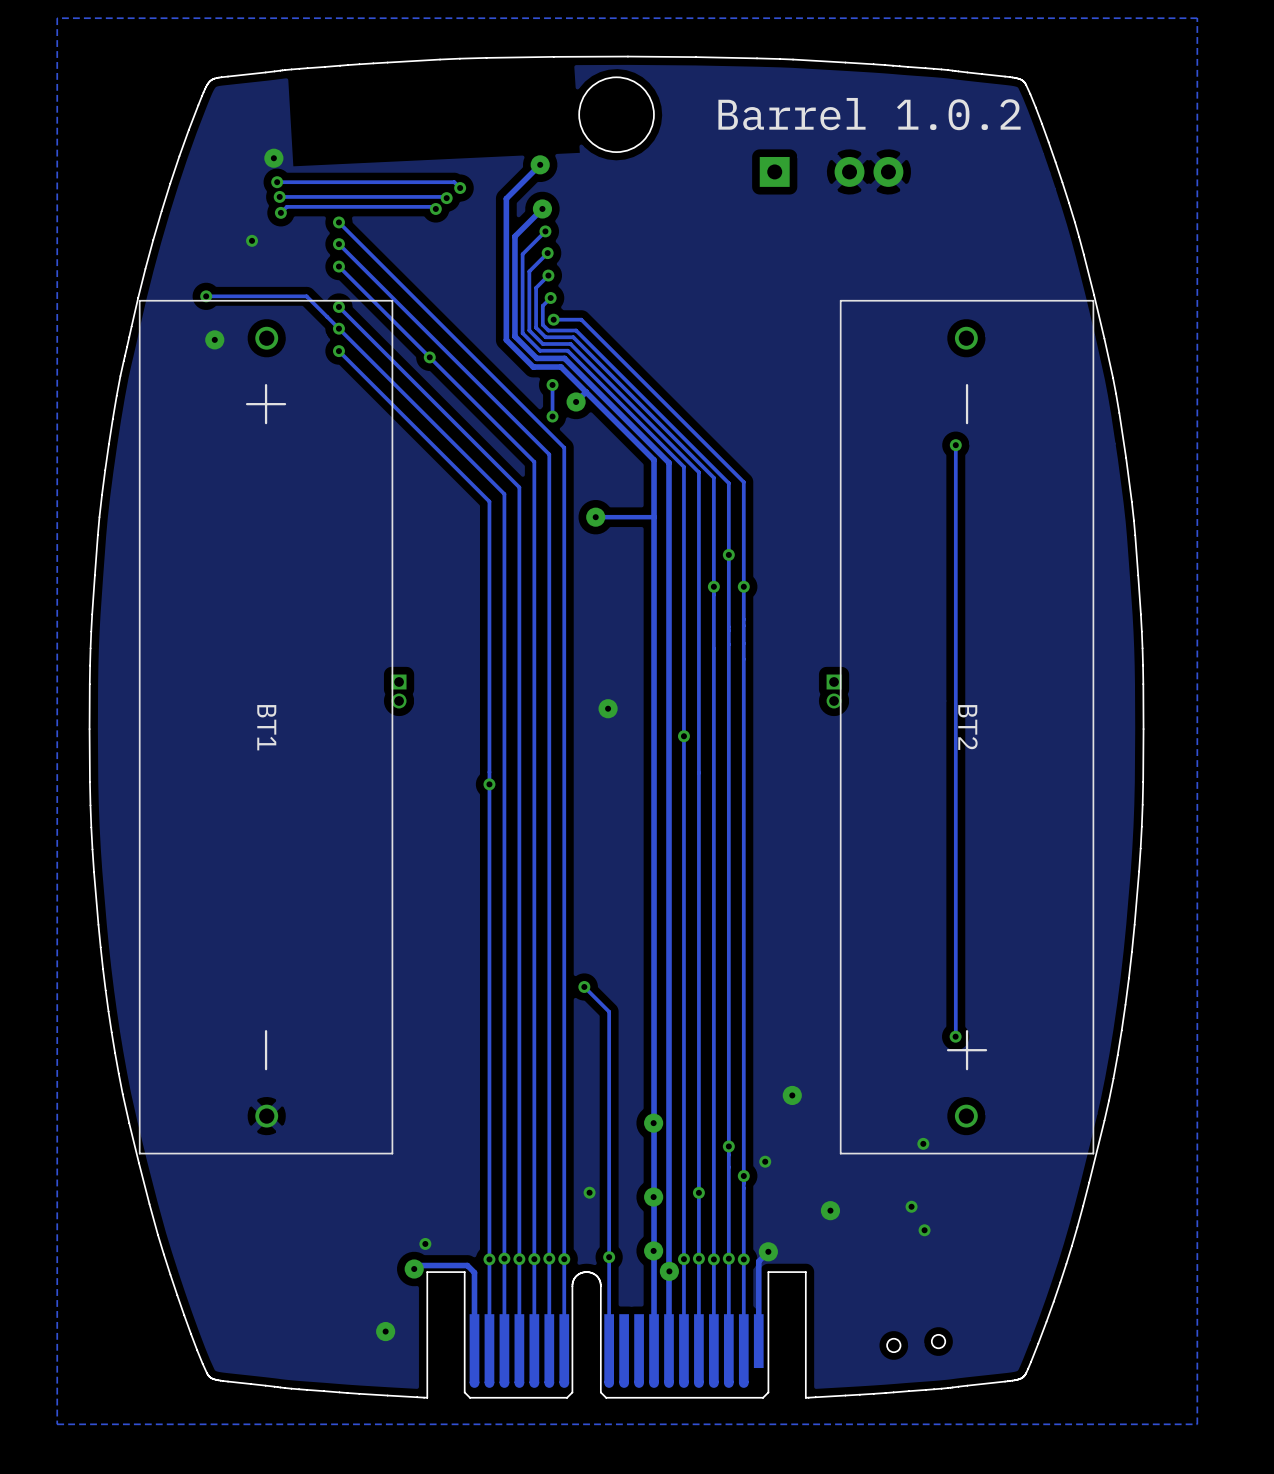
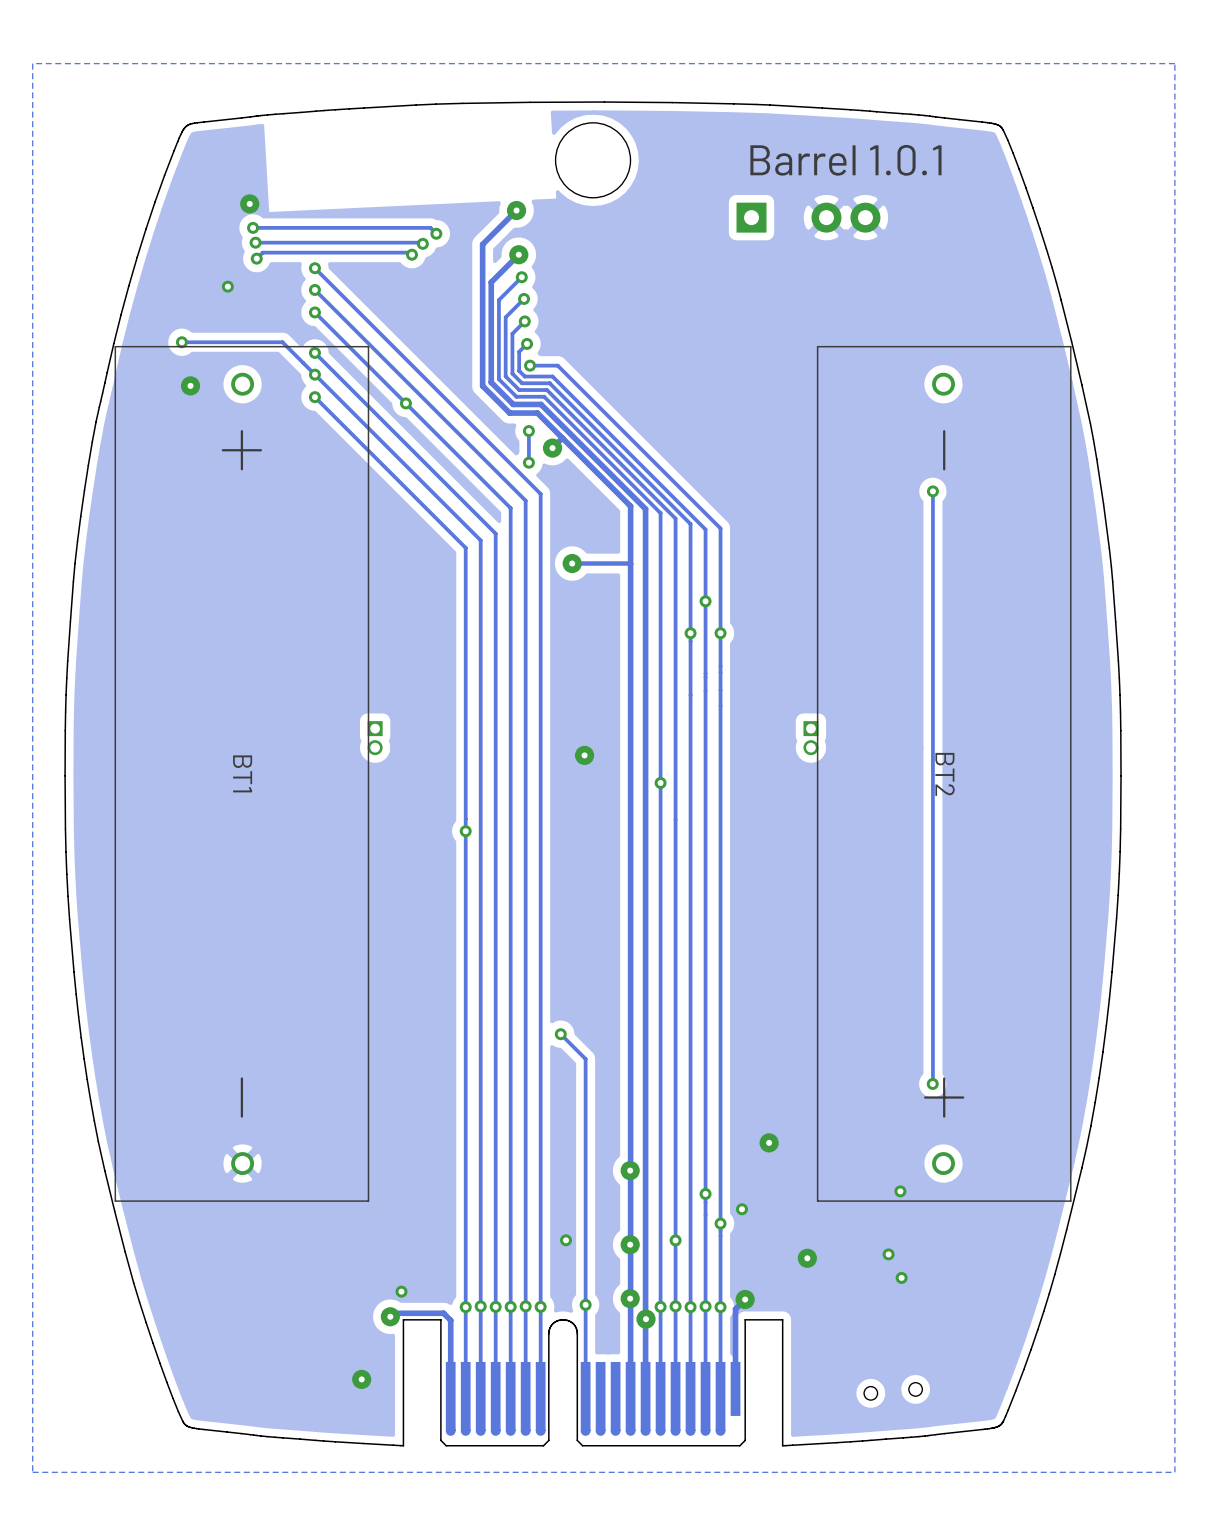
text: Barrel 1.0.2 (869, 114) -> Barrel 1.0.1 (845, 160)

